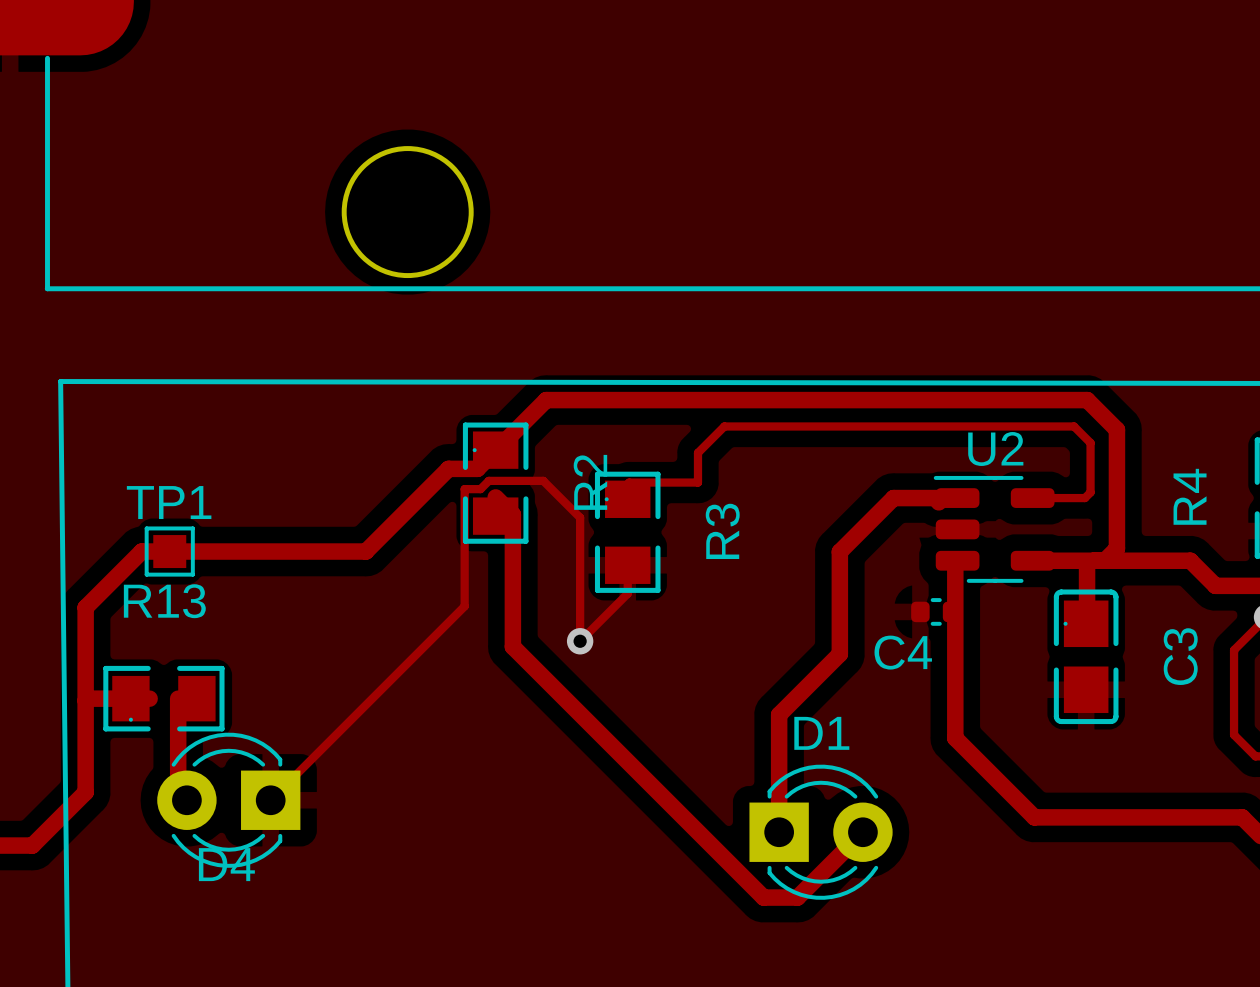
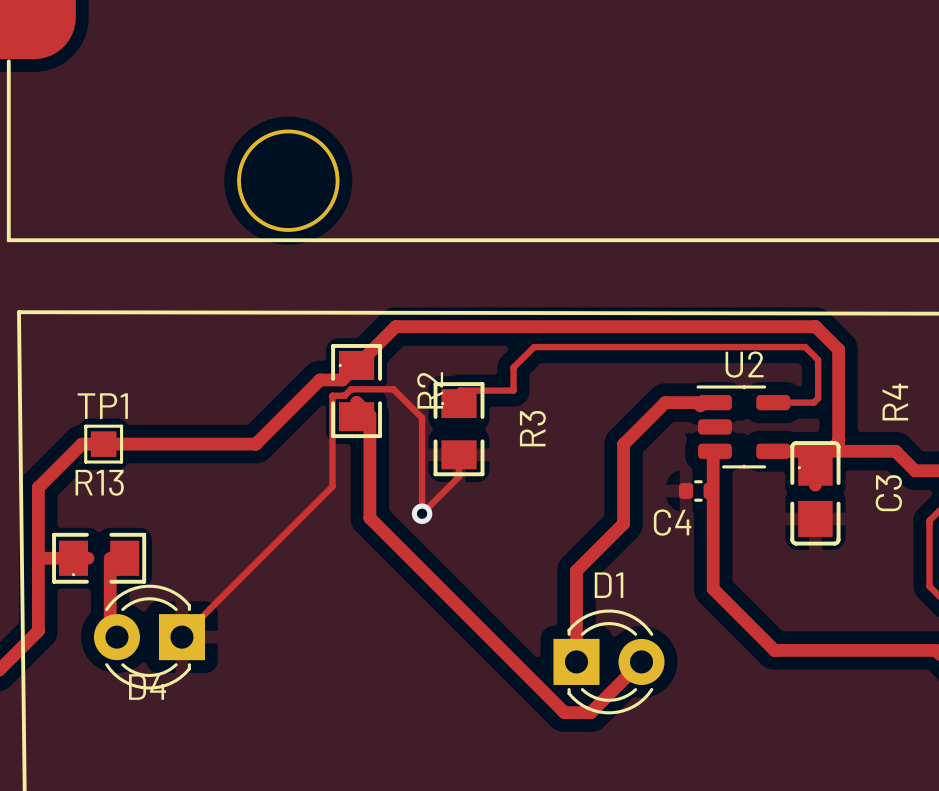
C3 position: (1086, 656) -> (815, 493)

